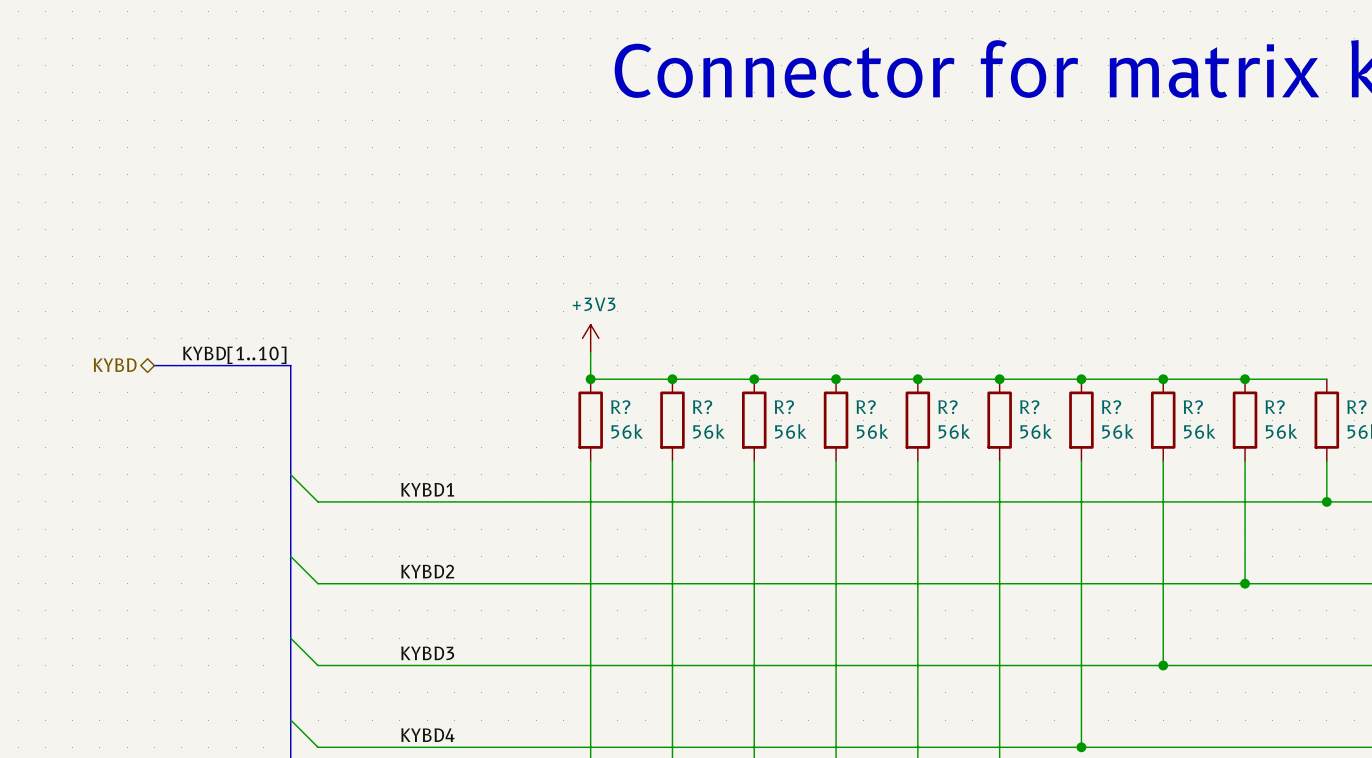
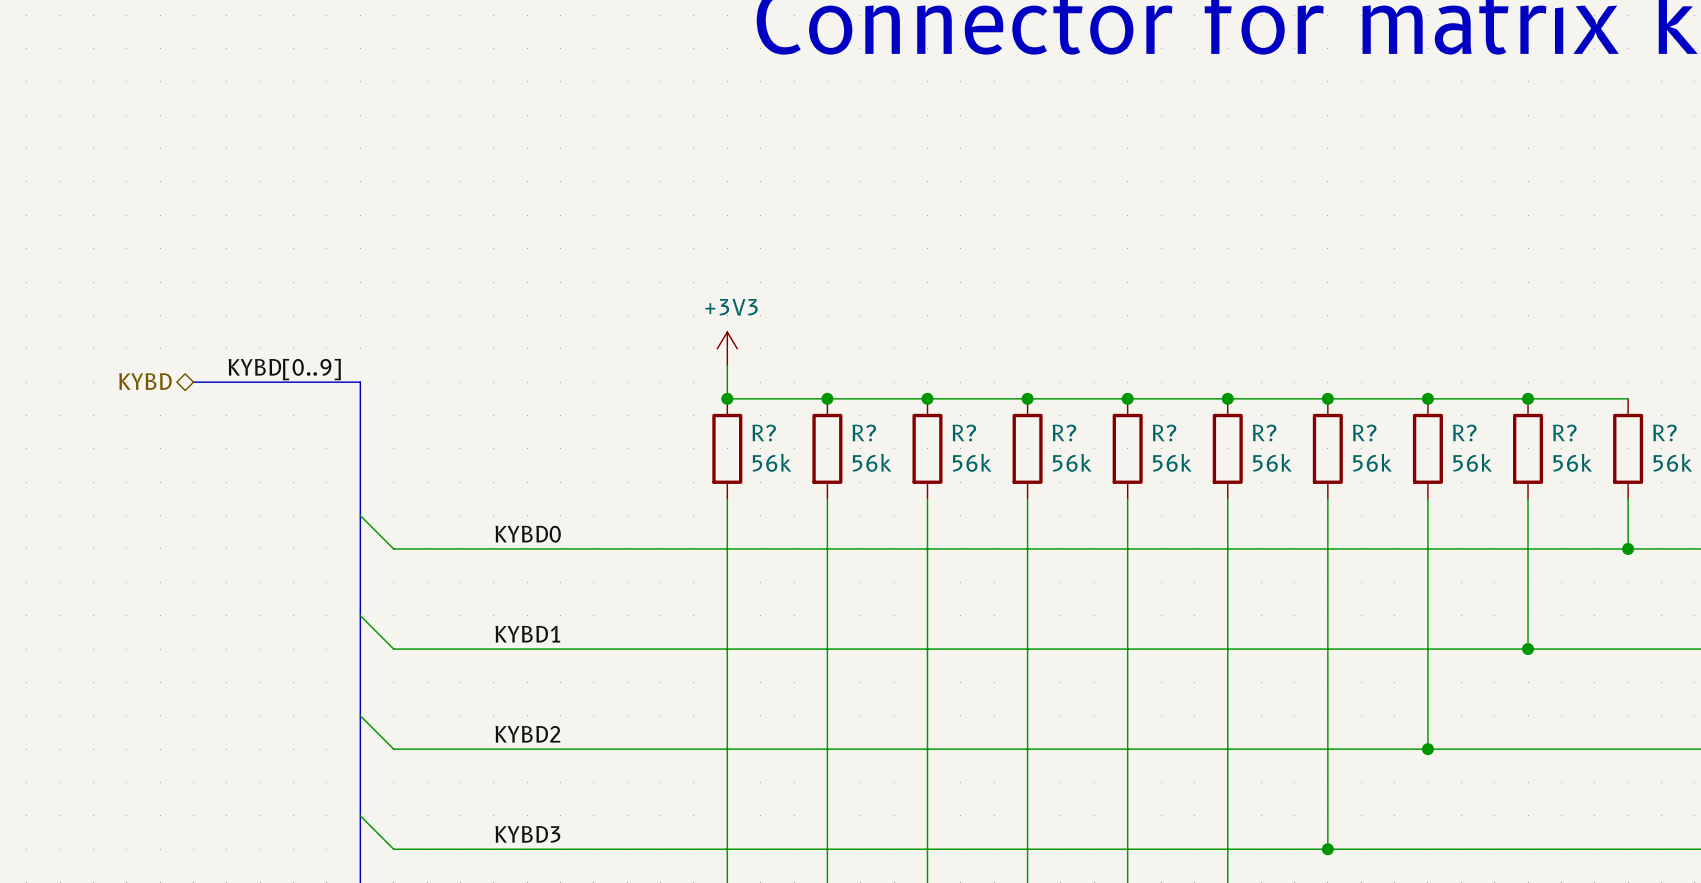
label: KYBD[1..10] (234, 355) -> KYBD[0..9] (284, 369)
label: KYBD1 (427, 489) -> KYBD0 (528, 534)
label: KYBD2 (427, 571) -> KYBD1 (527, 634)
label: KYBD3 (427, 653) -> KYBD2 (527, 734)
label: KYBD4 (427, 735) -> KYBD3 (527, 834)

